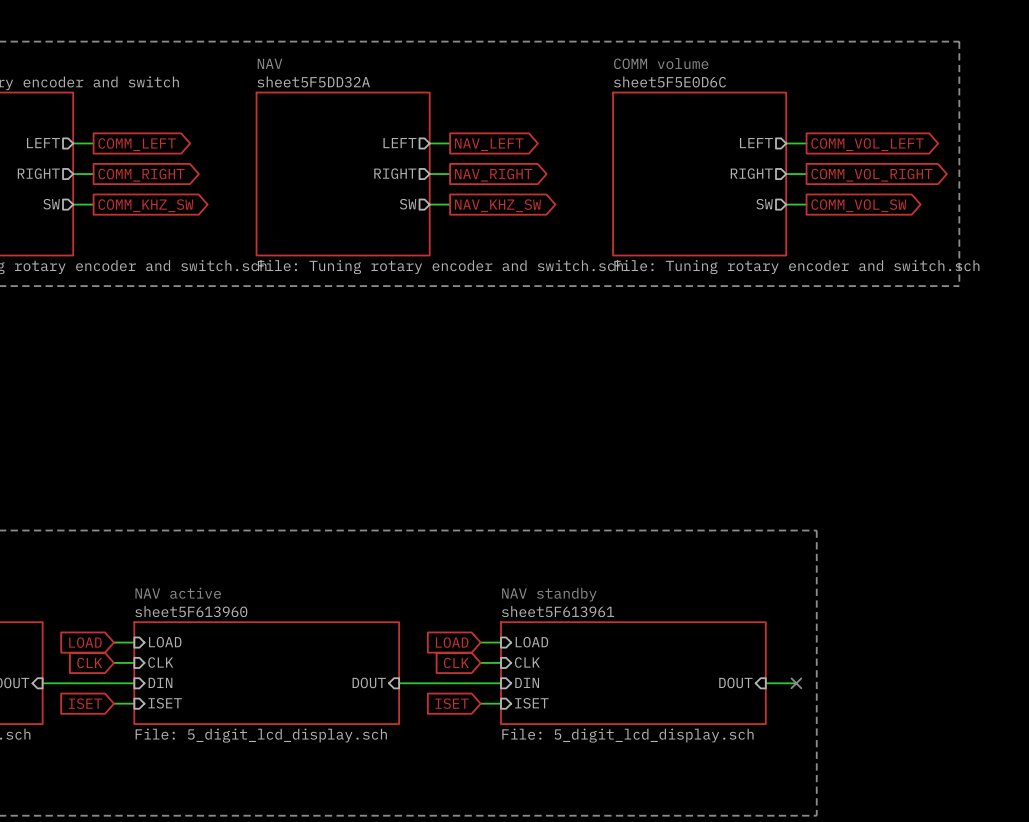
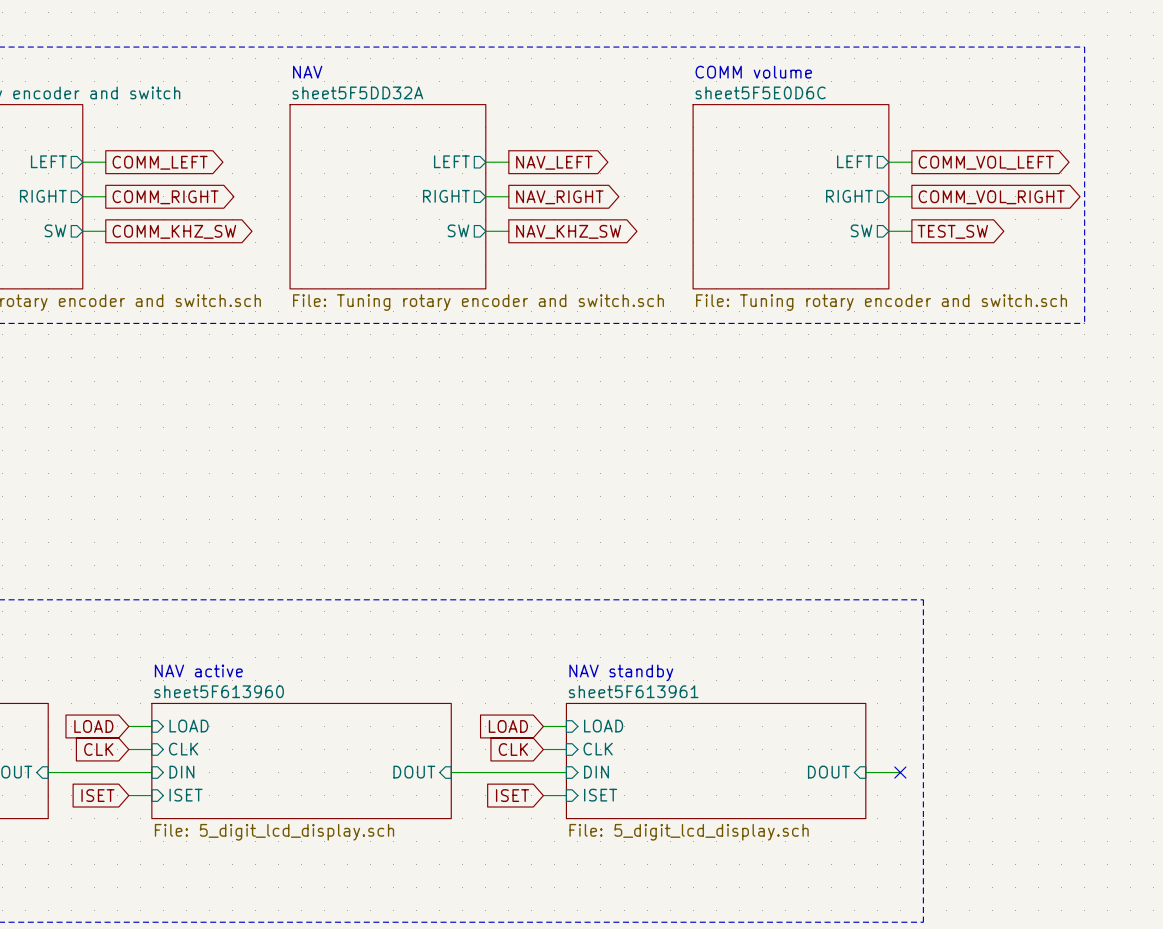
global label: COMM_VOL_SW (858, 205) -> TEST_SW (952, 231)

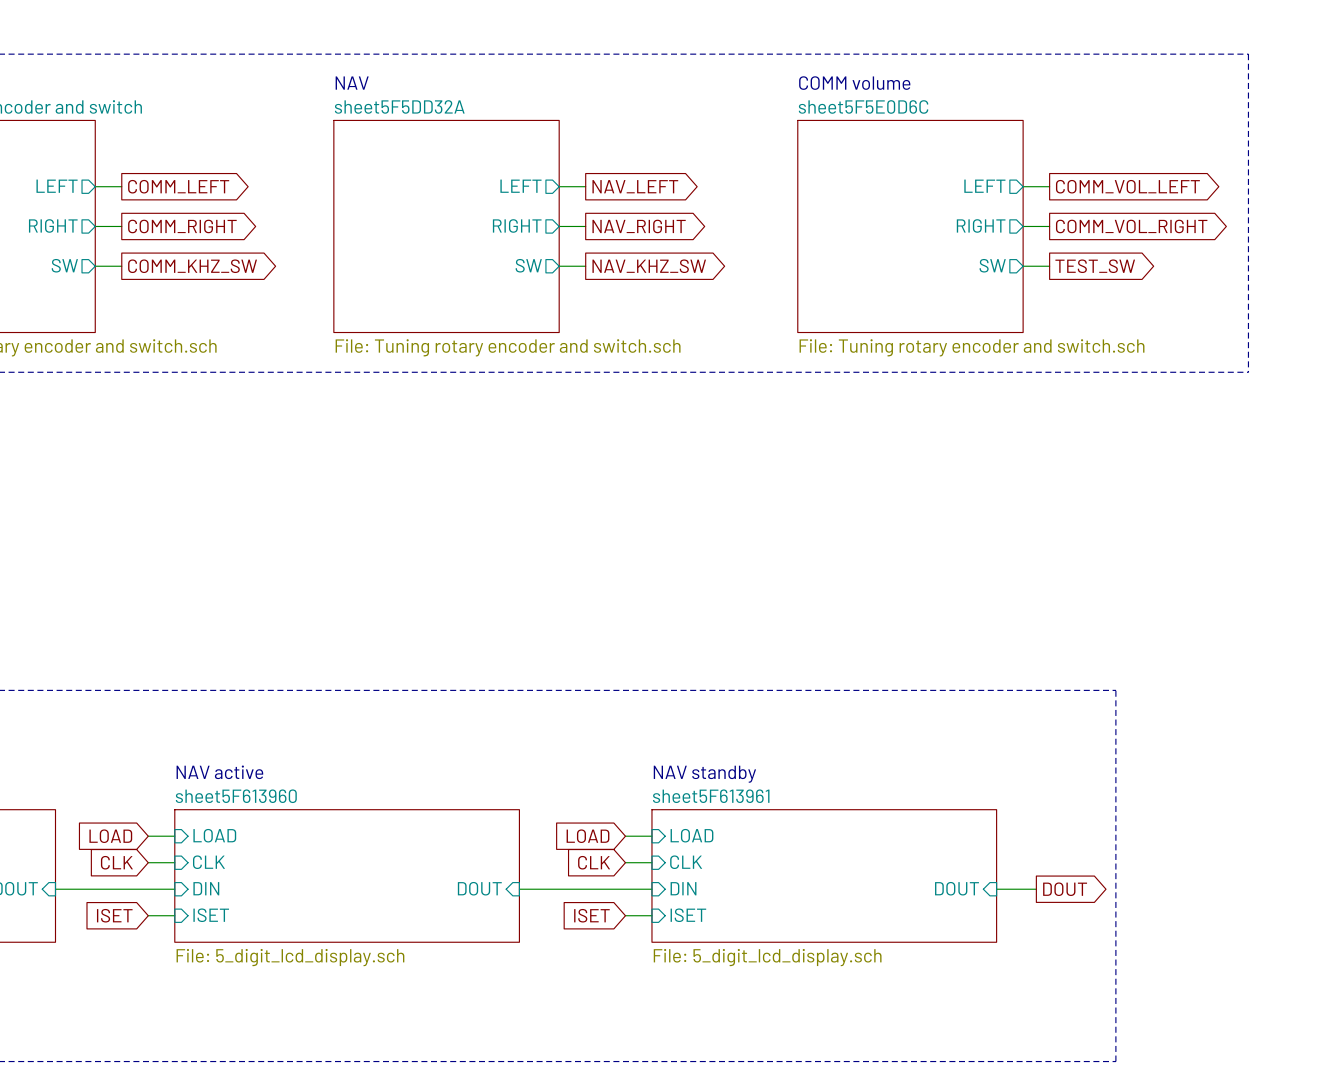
line: (923, 599) (923, 922) -> (1062, 690) (1115, 690) (1115, 1061) (1062, 1061)
no-connect mark: (900, 772) -> none
global label: none -> DOUT (1065, 889)

